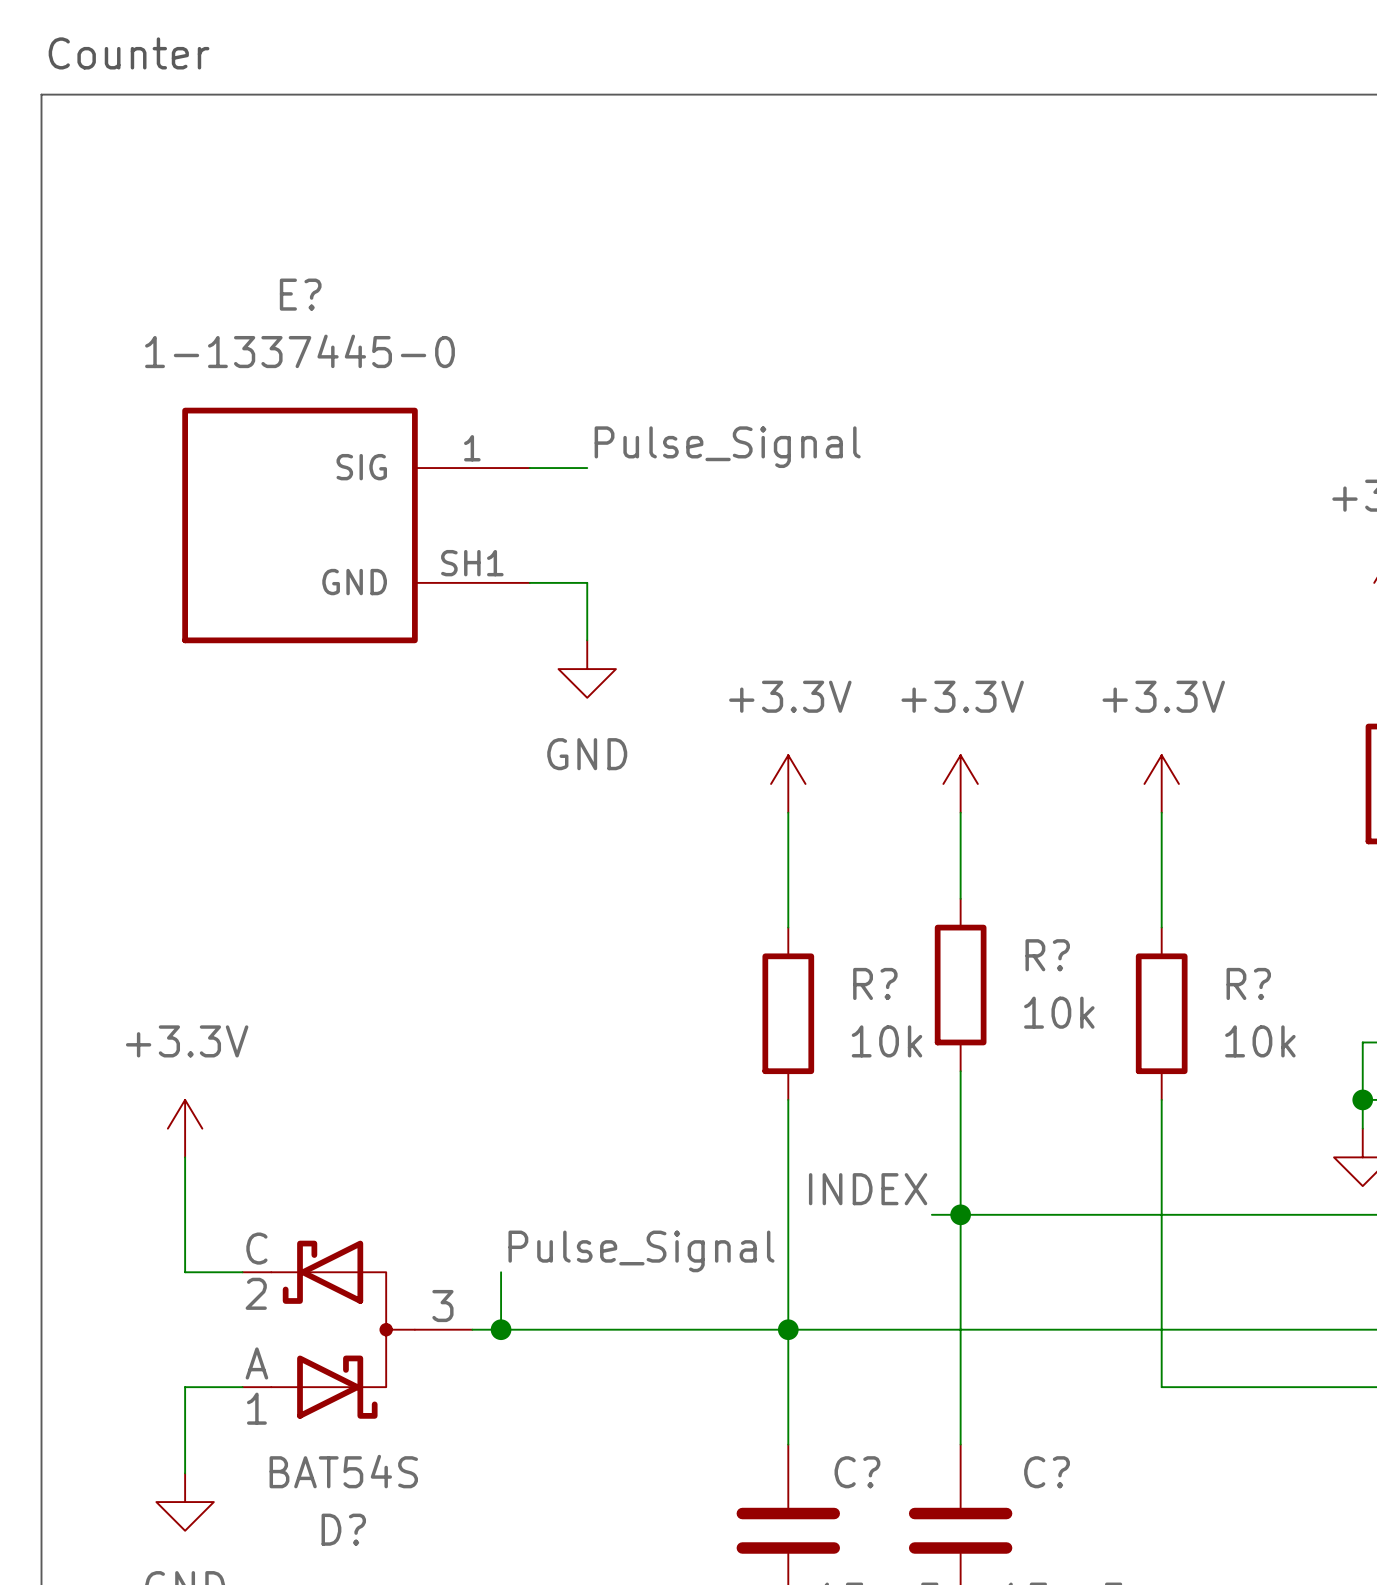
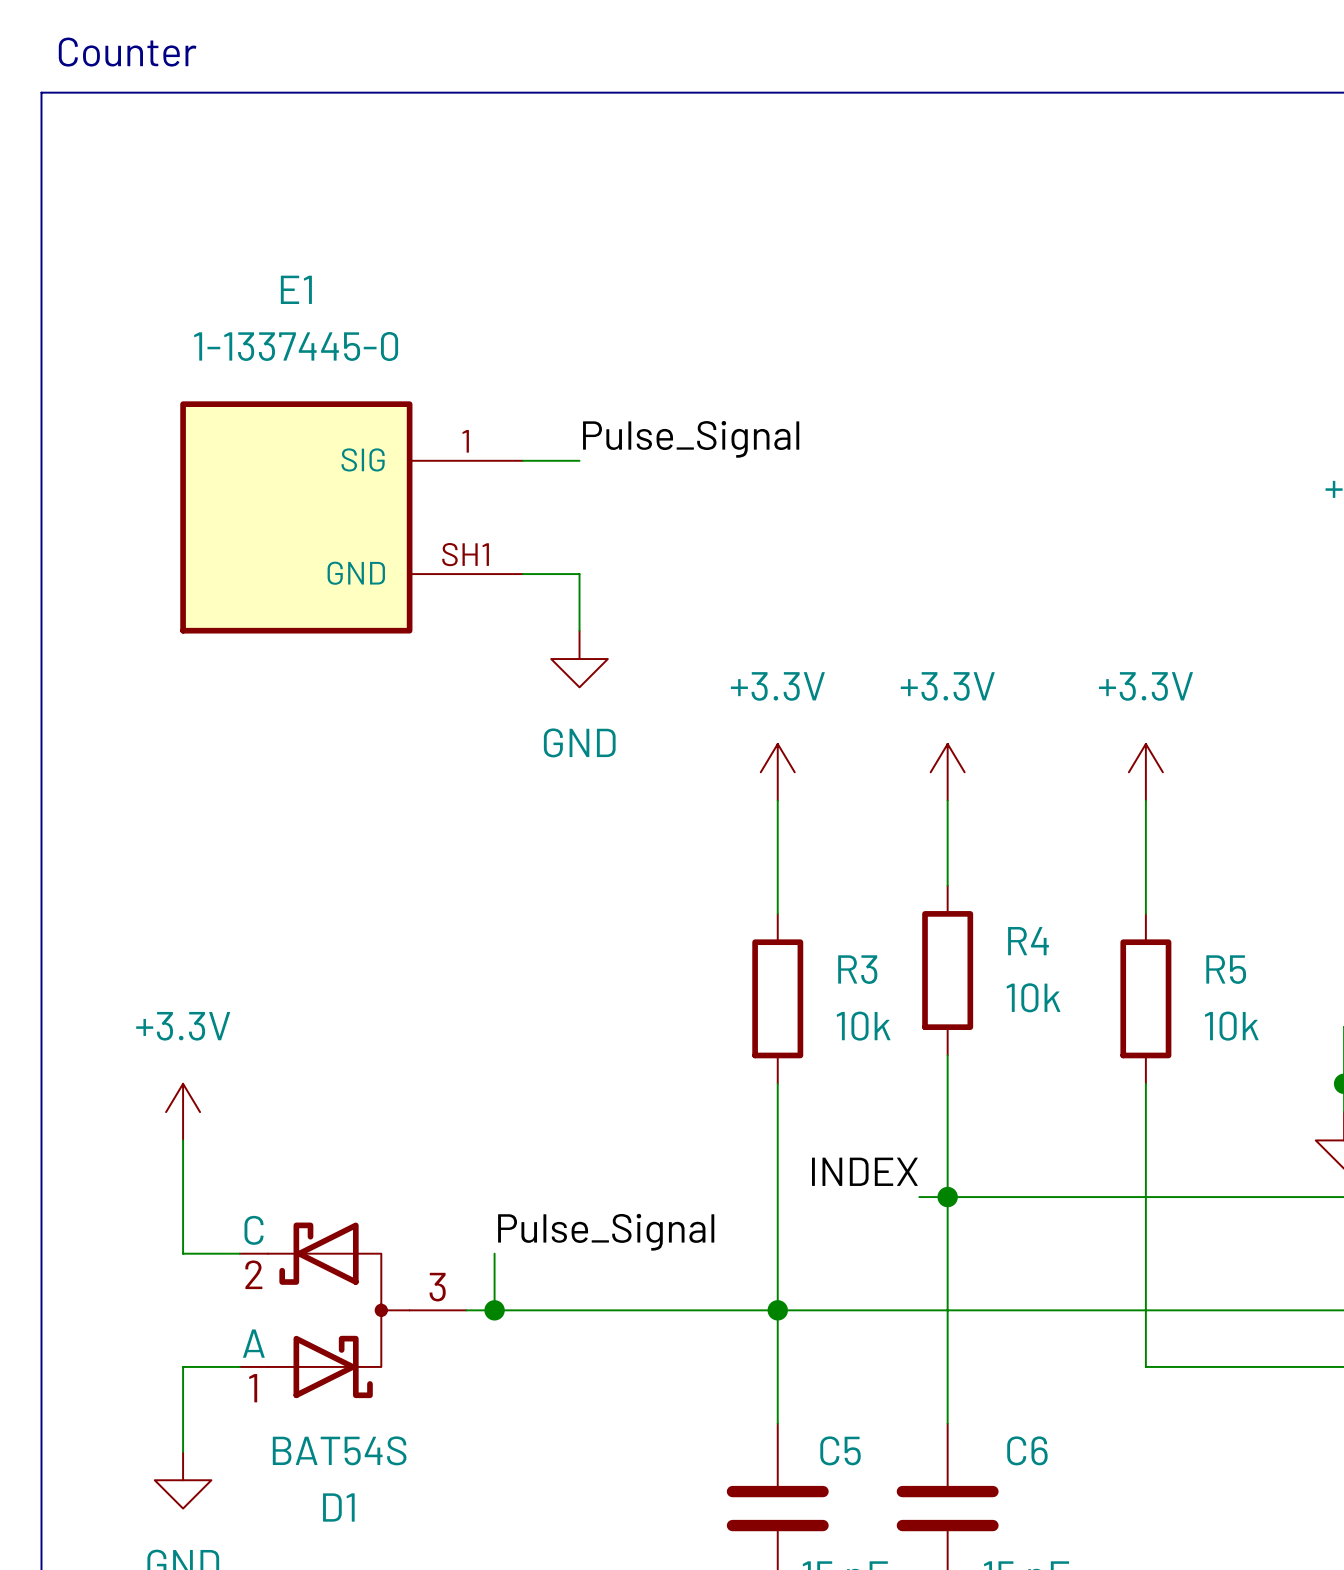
E? name: E? (300, 294) -> E1 (296, 289)
R? name: R? (1047, 955) -> R4 (1028, 941)
R? name: R? (875, 983) -> R3 (857, 969)
R? name: R? (1248, 983) -> R5 (1226, 969)
C? name: C? (857, 1472) -> C5 (840, 1450)
C? name: C? (1047, 1472) -> C6 (1027, 1450)
D? name: D? (343, 1529) -> D1 (338, 1507)

